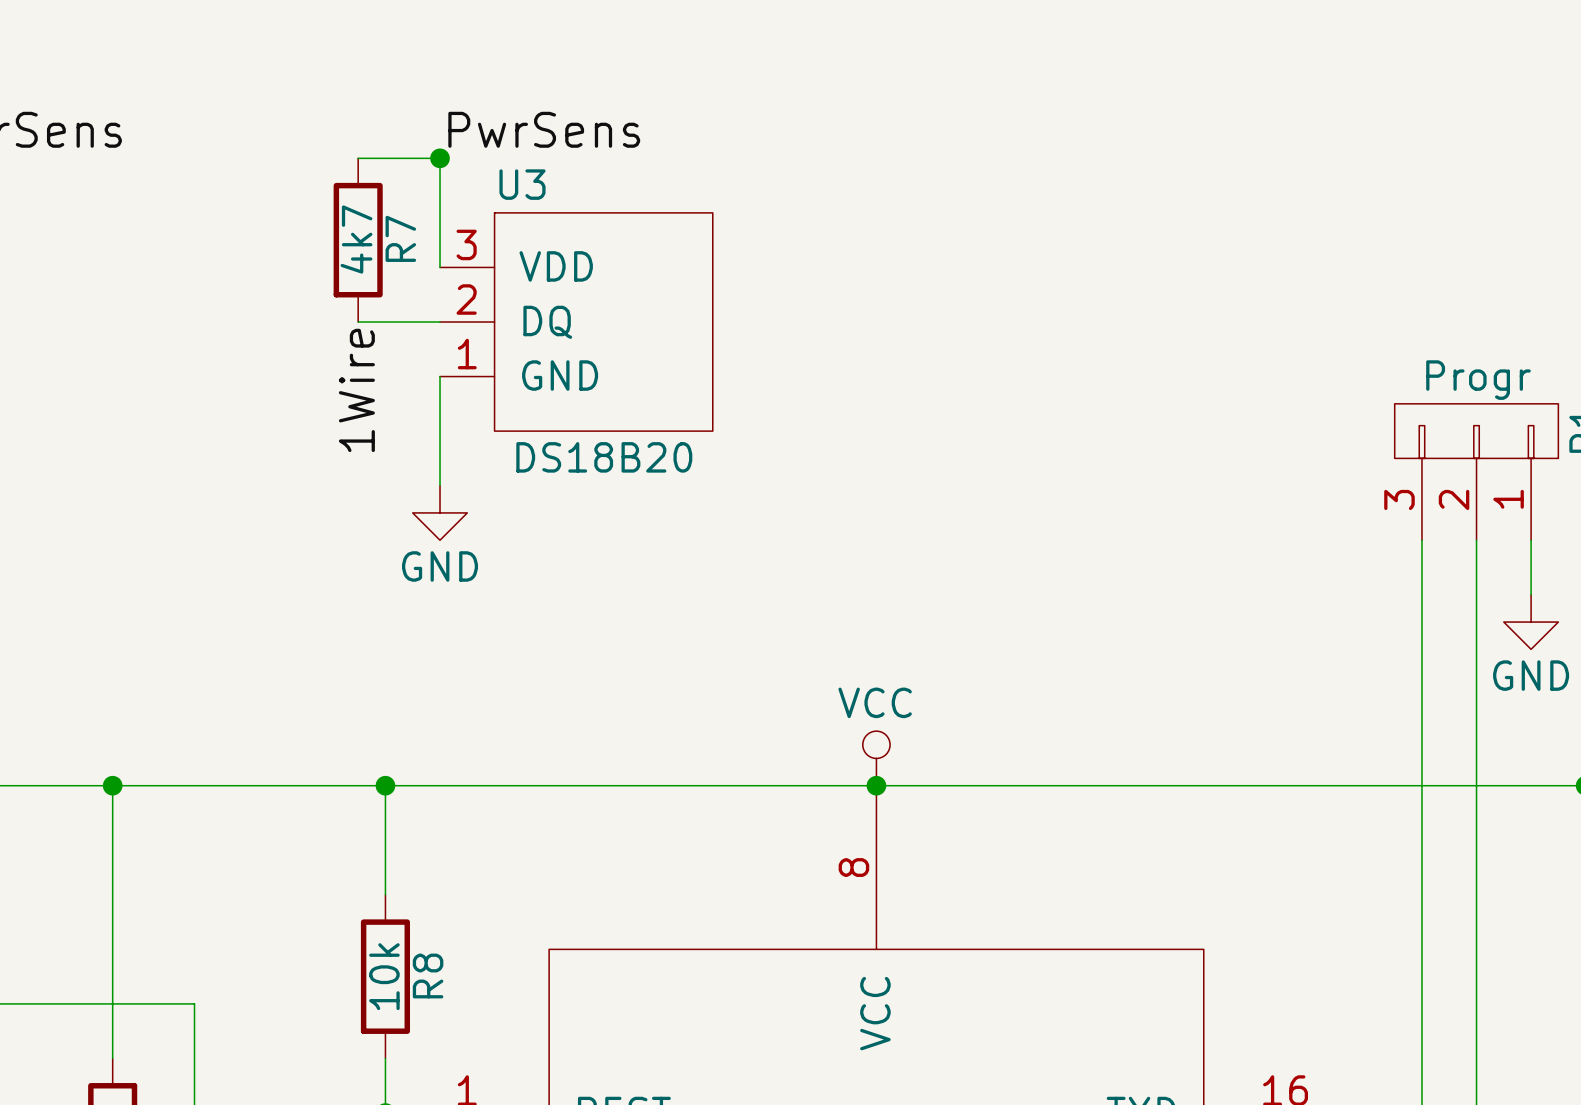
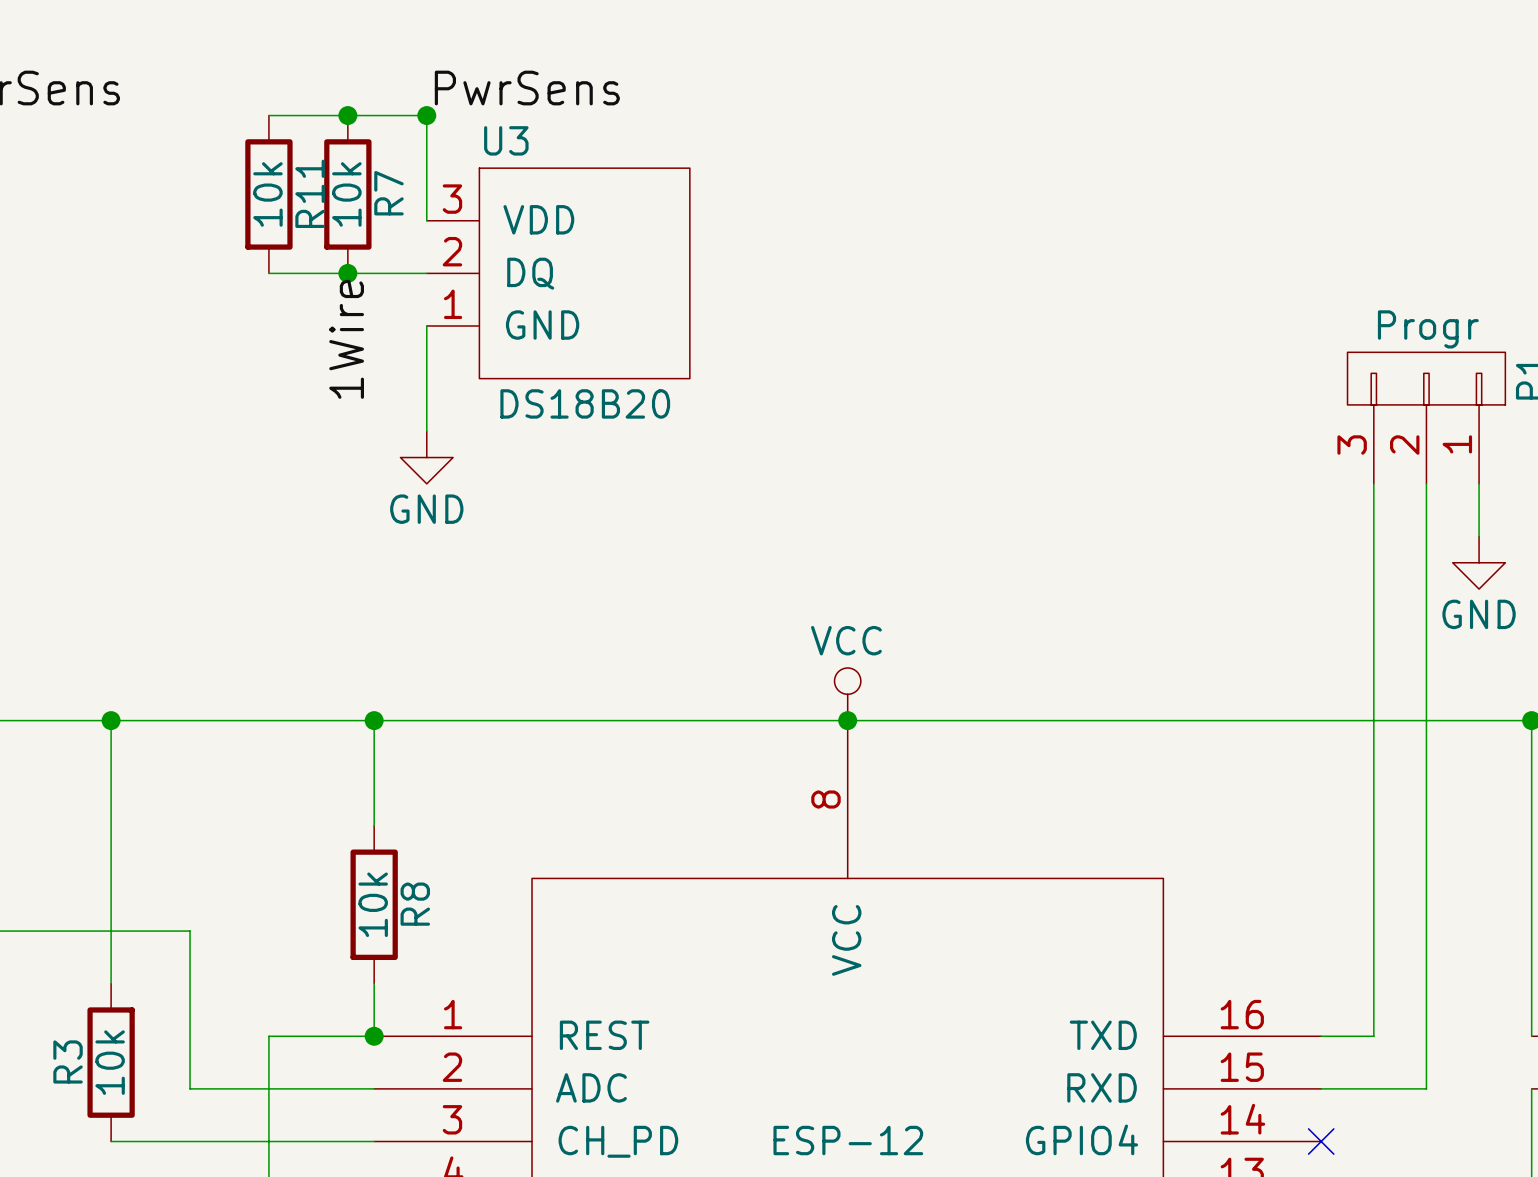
wire: none -> (268, 115) (347, 115)
junction: none -> (347, 115)
R7 value: 4k7 (356, 239) -> 10k (346, 194)
R11: none -> 10k (268, 194)
wire: none -> (268, 273) (347, 273)
junction: none -> (347, 273)

